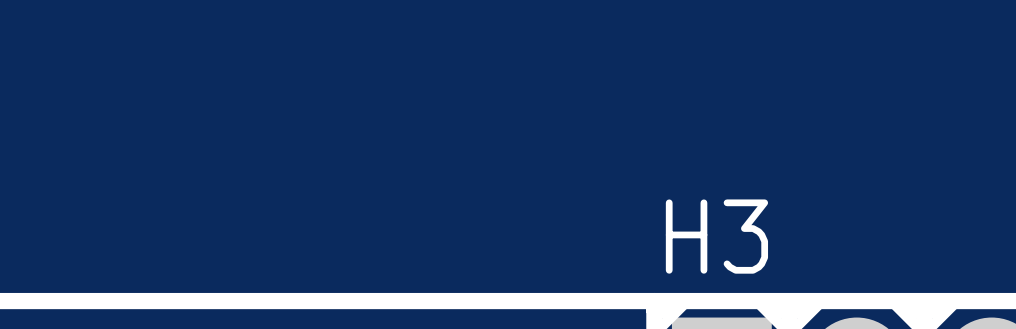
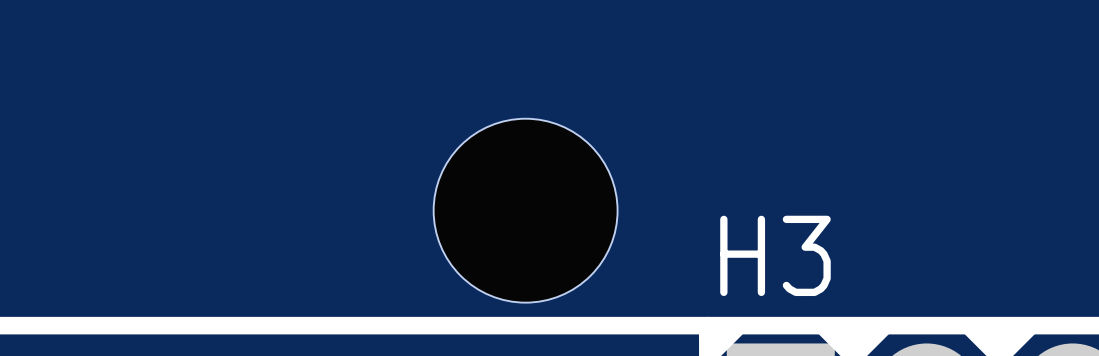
hole: none -> (525, 210)

